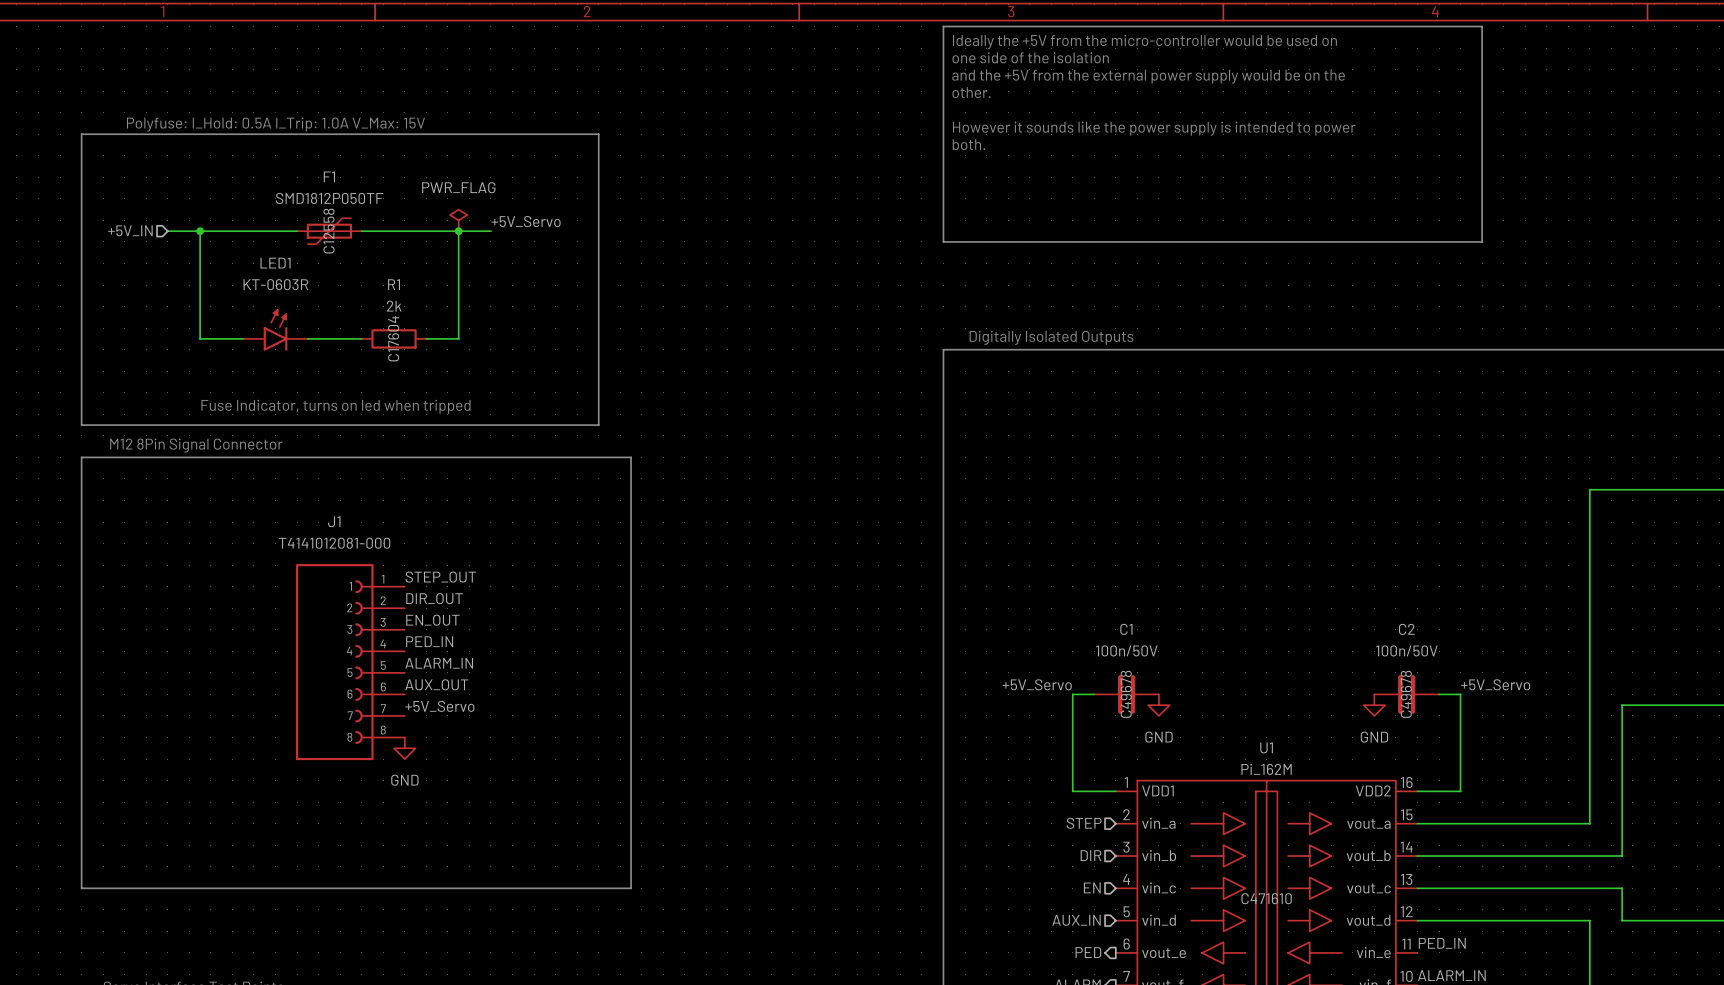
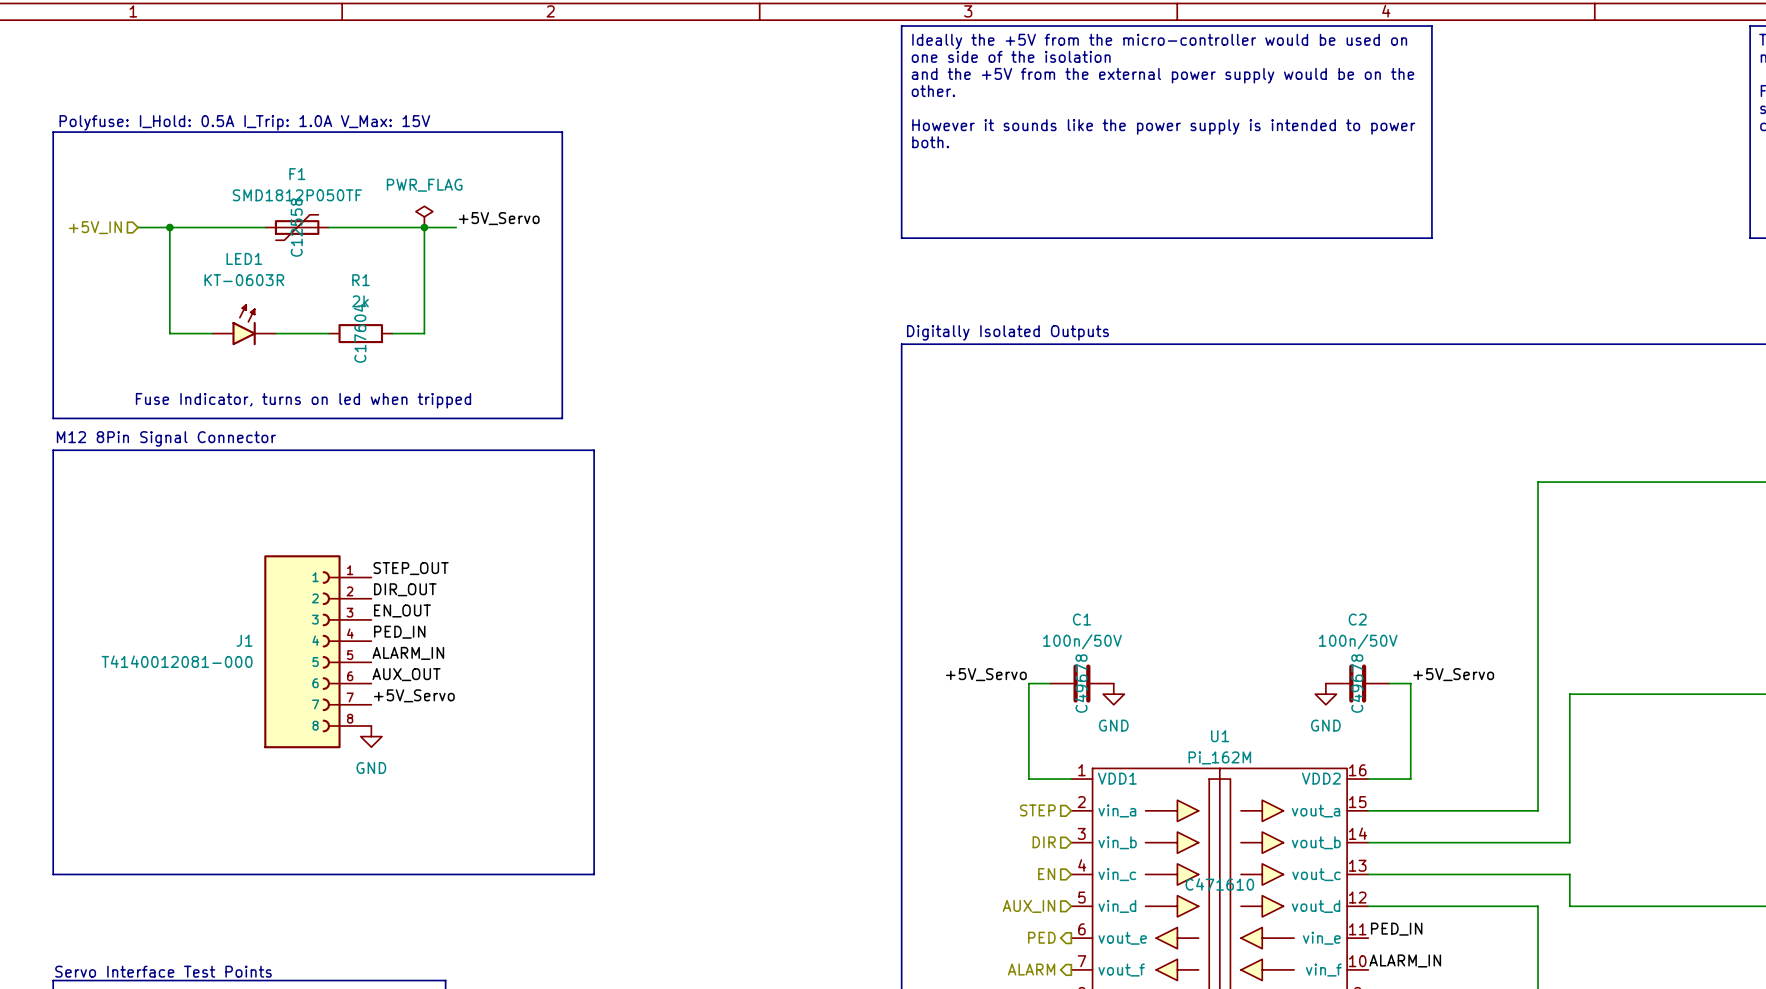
J1 name position: J1 (334, 521) -> J1 (244, 640)
J1 value: T4141012081-000 (334, 543) -> T4140012081-000 (177, 661)

